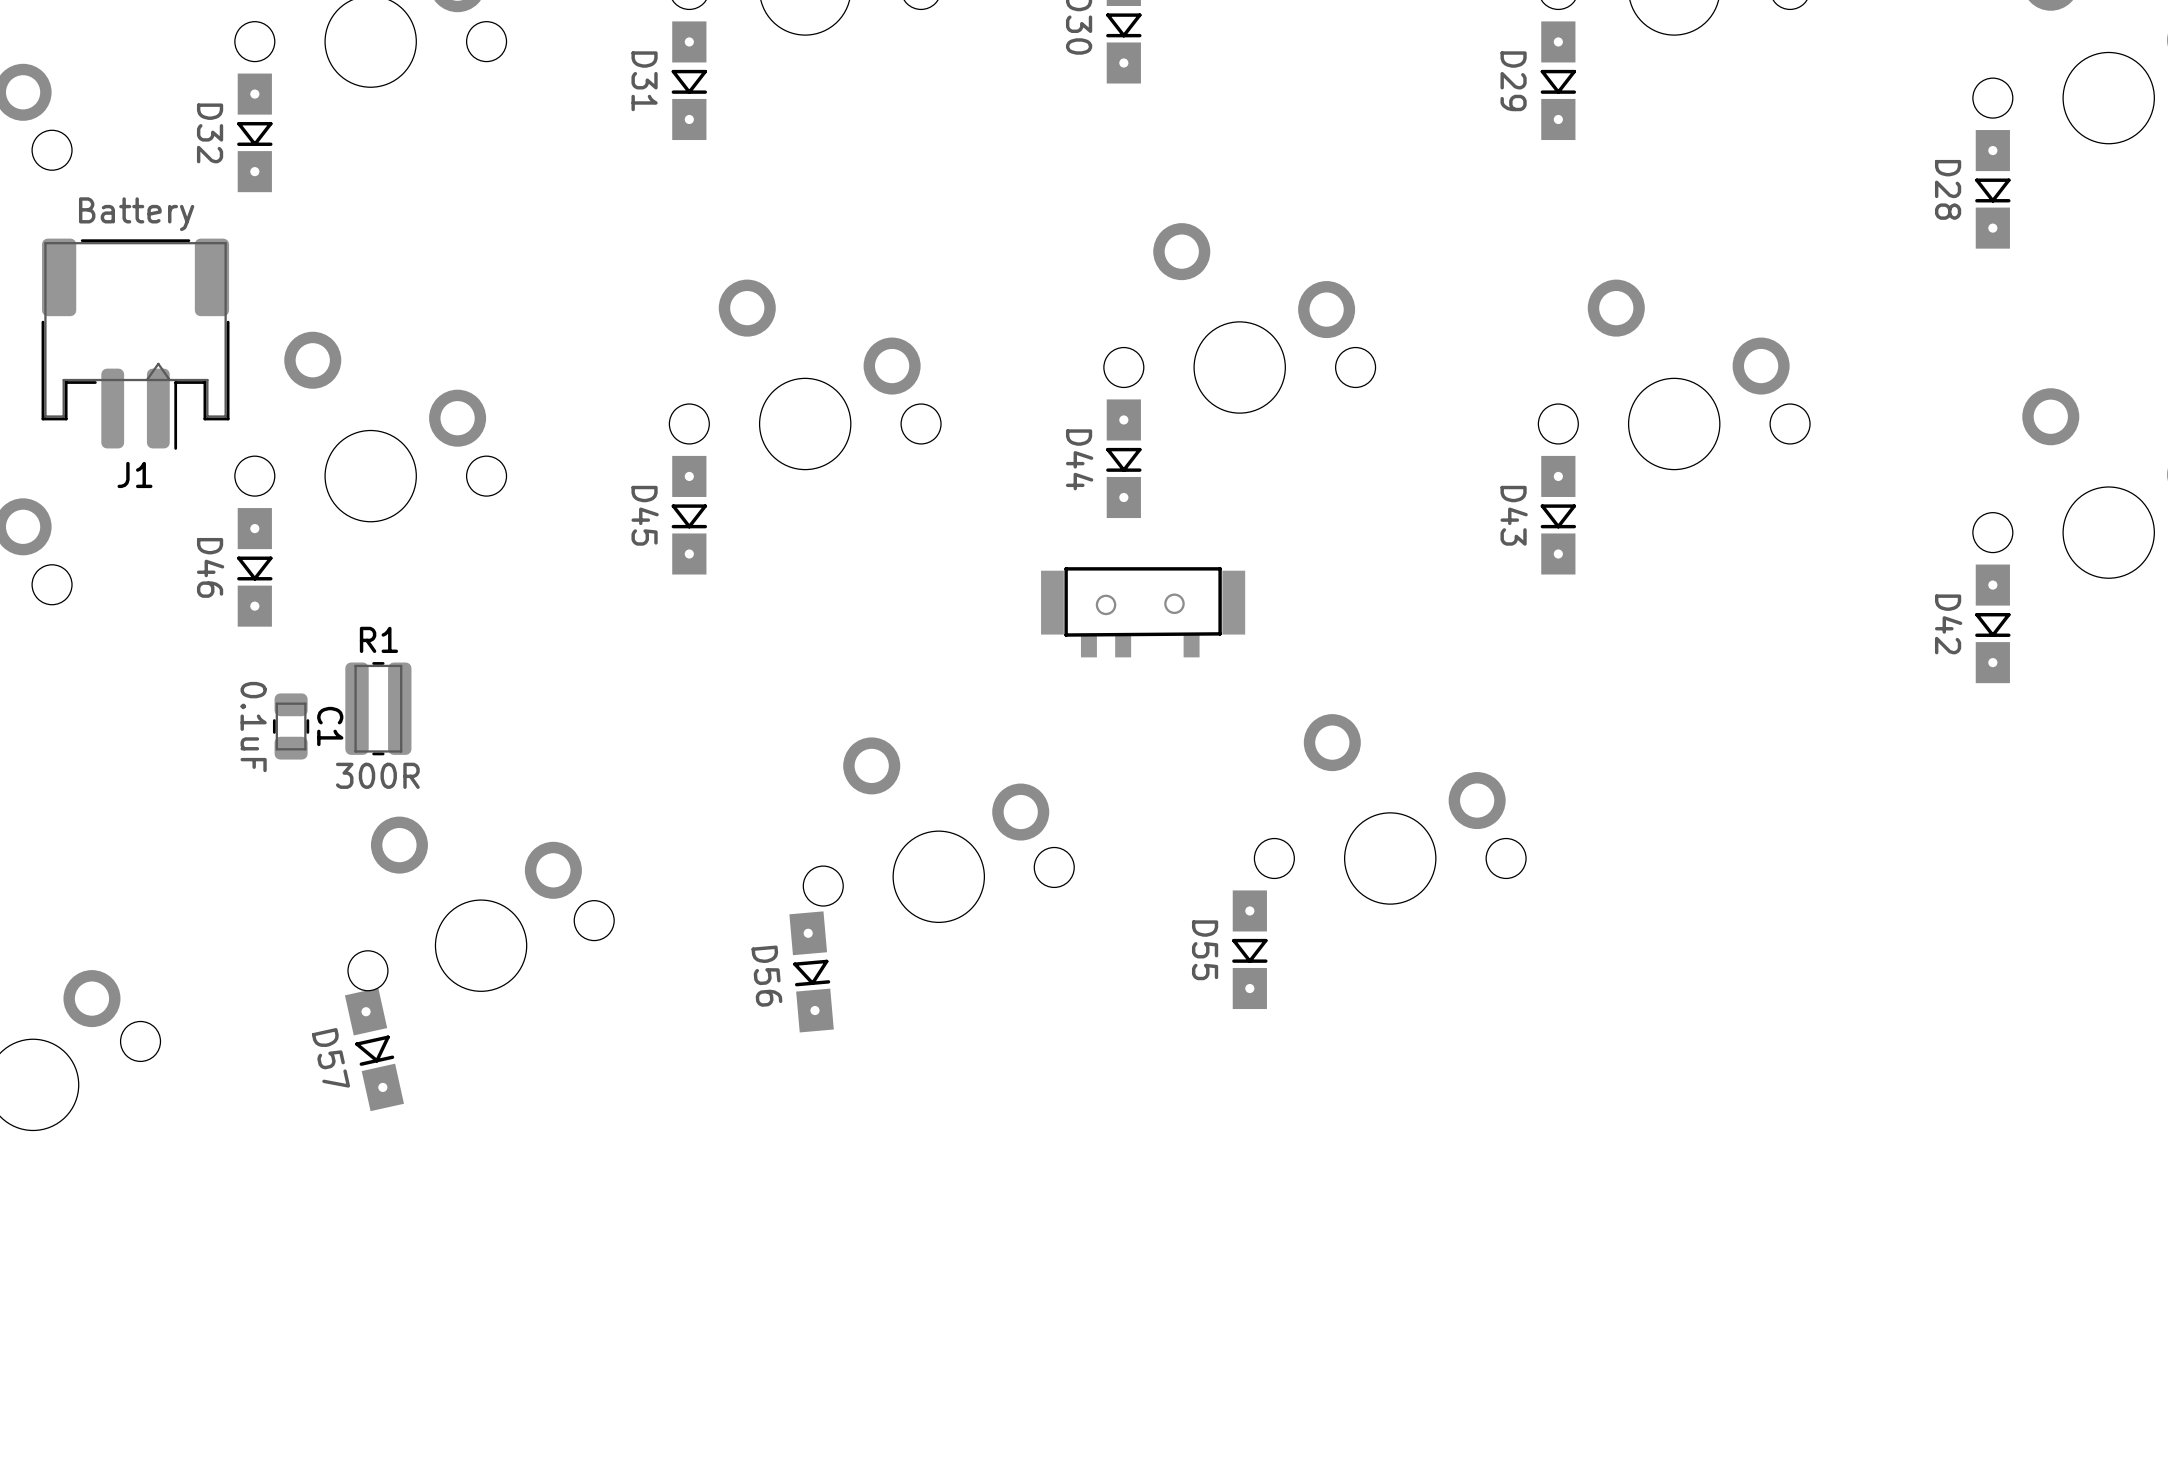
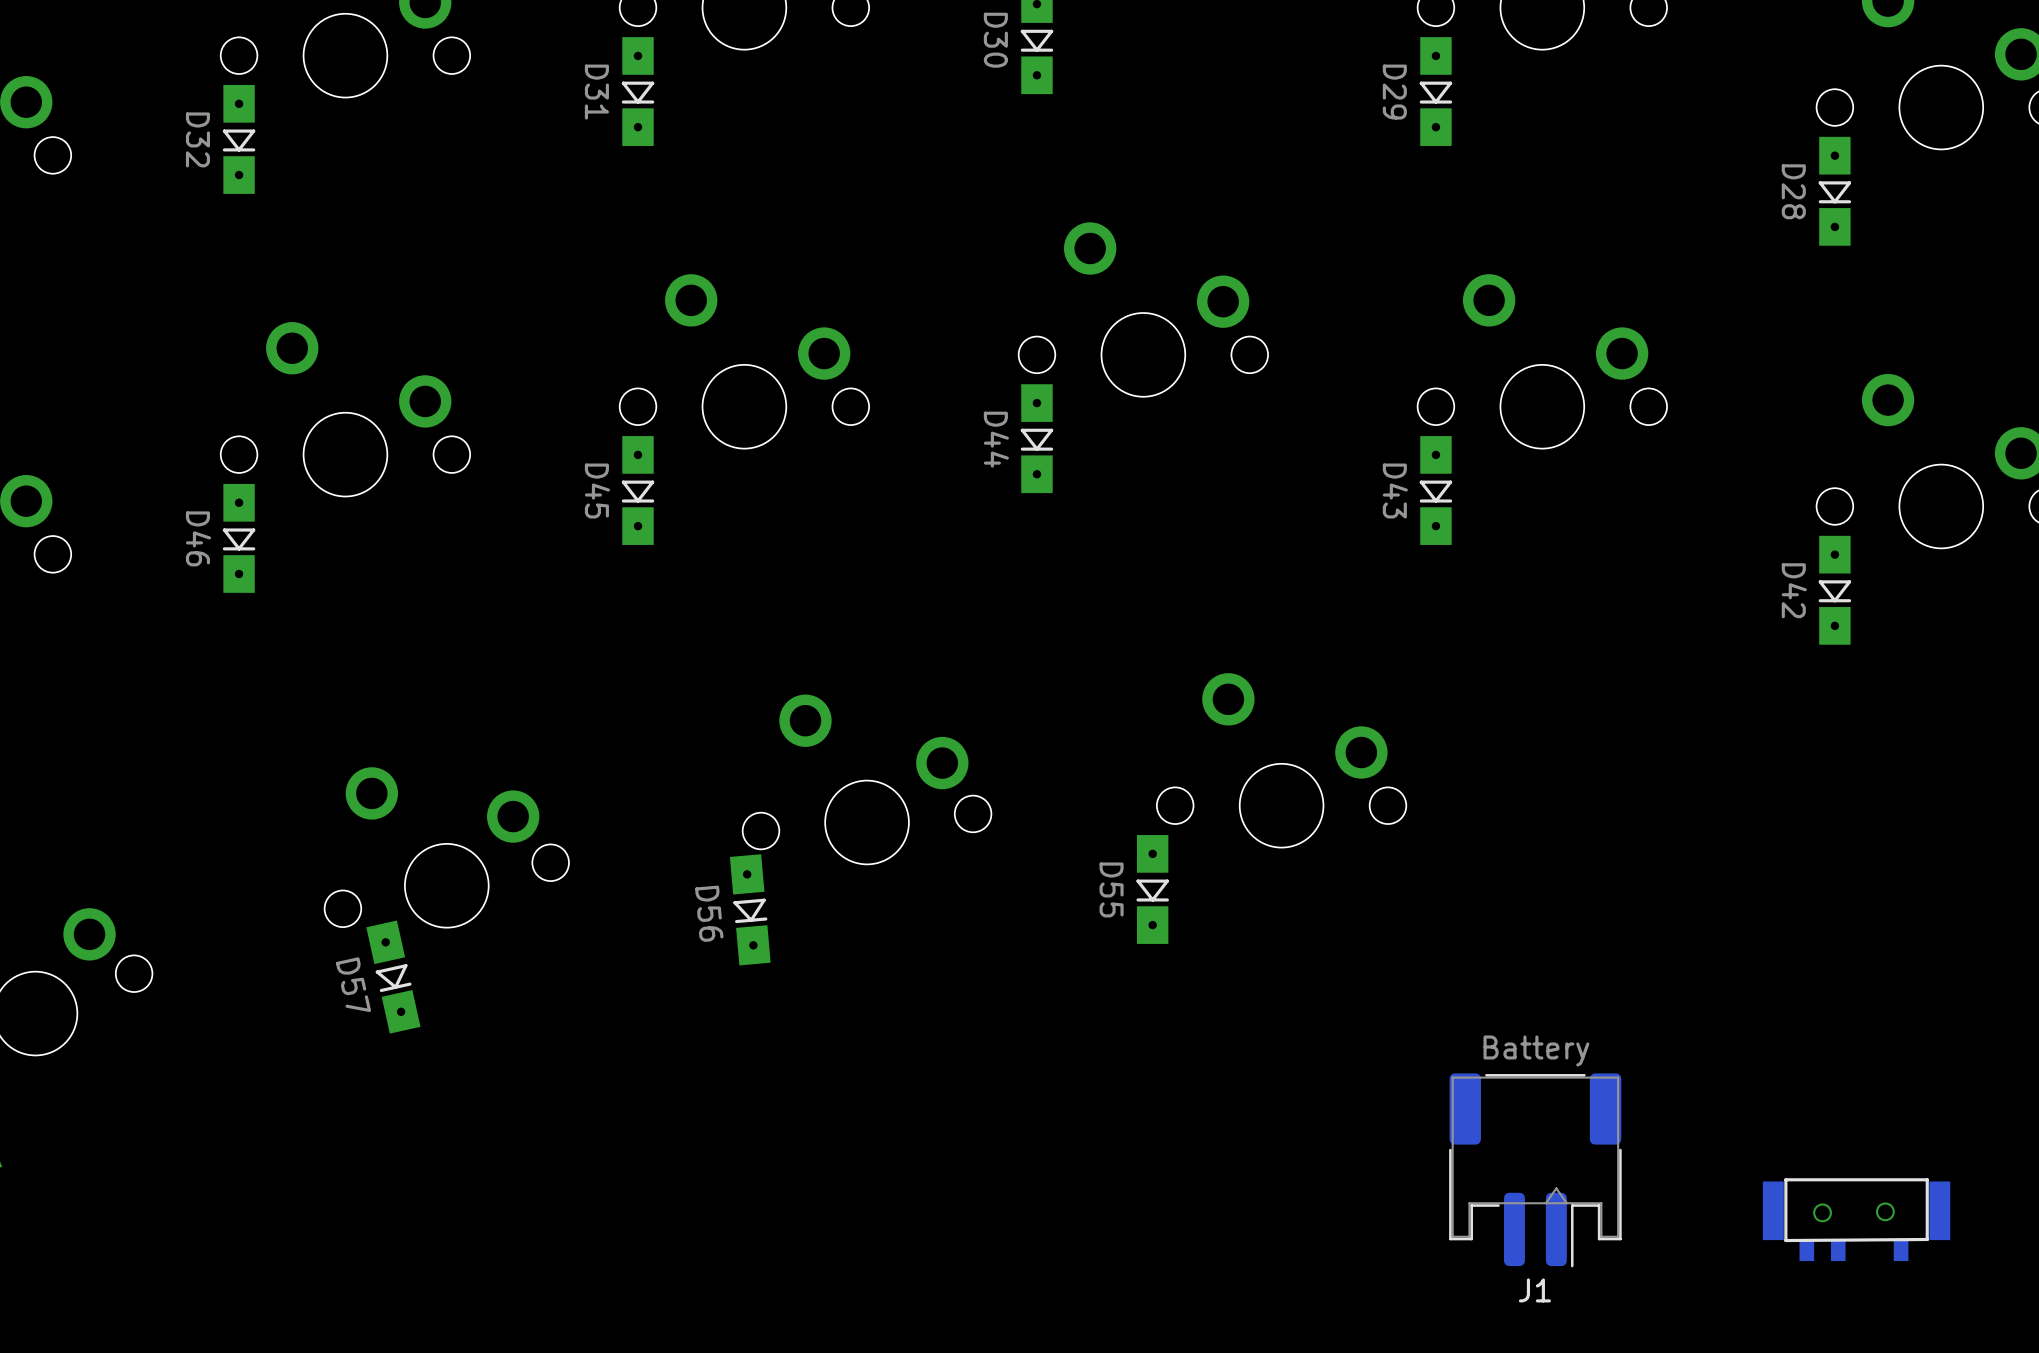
J1 position: (135, 344) -> (1535, 1170)
part: (1143, 612) -> none
R1: 300R (378, 708) -> none
C1: 0.1uF (291, 726) -> none
D57 position: (374, 1049) -> (393, 977)
part: none -> (1856, 1219)

